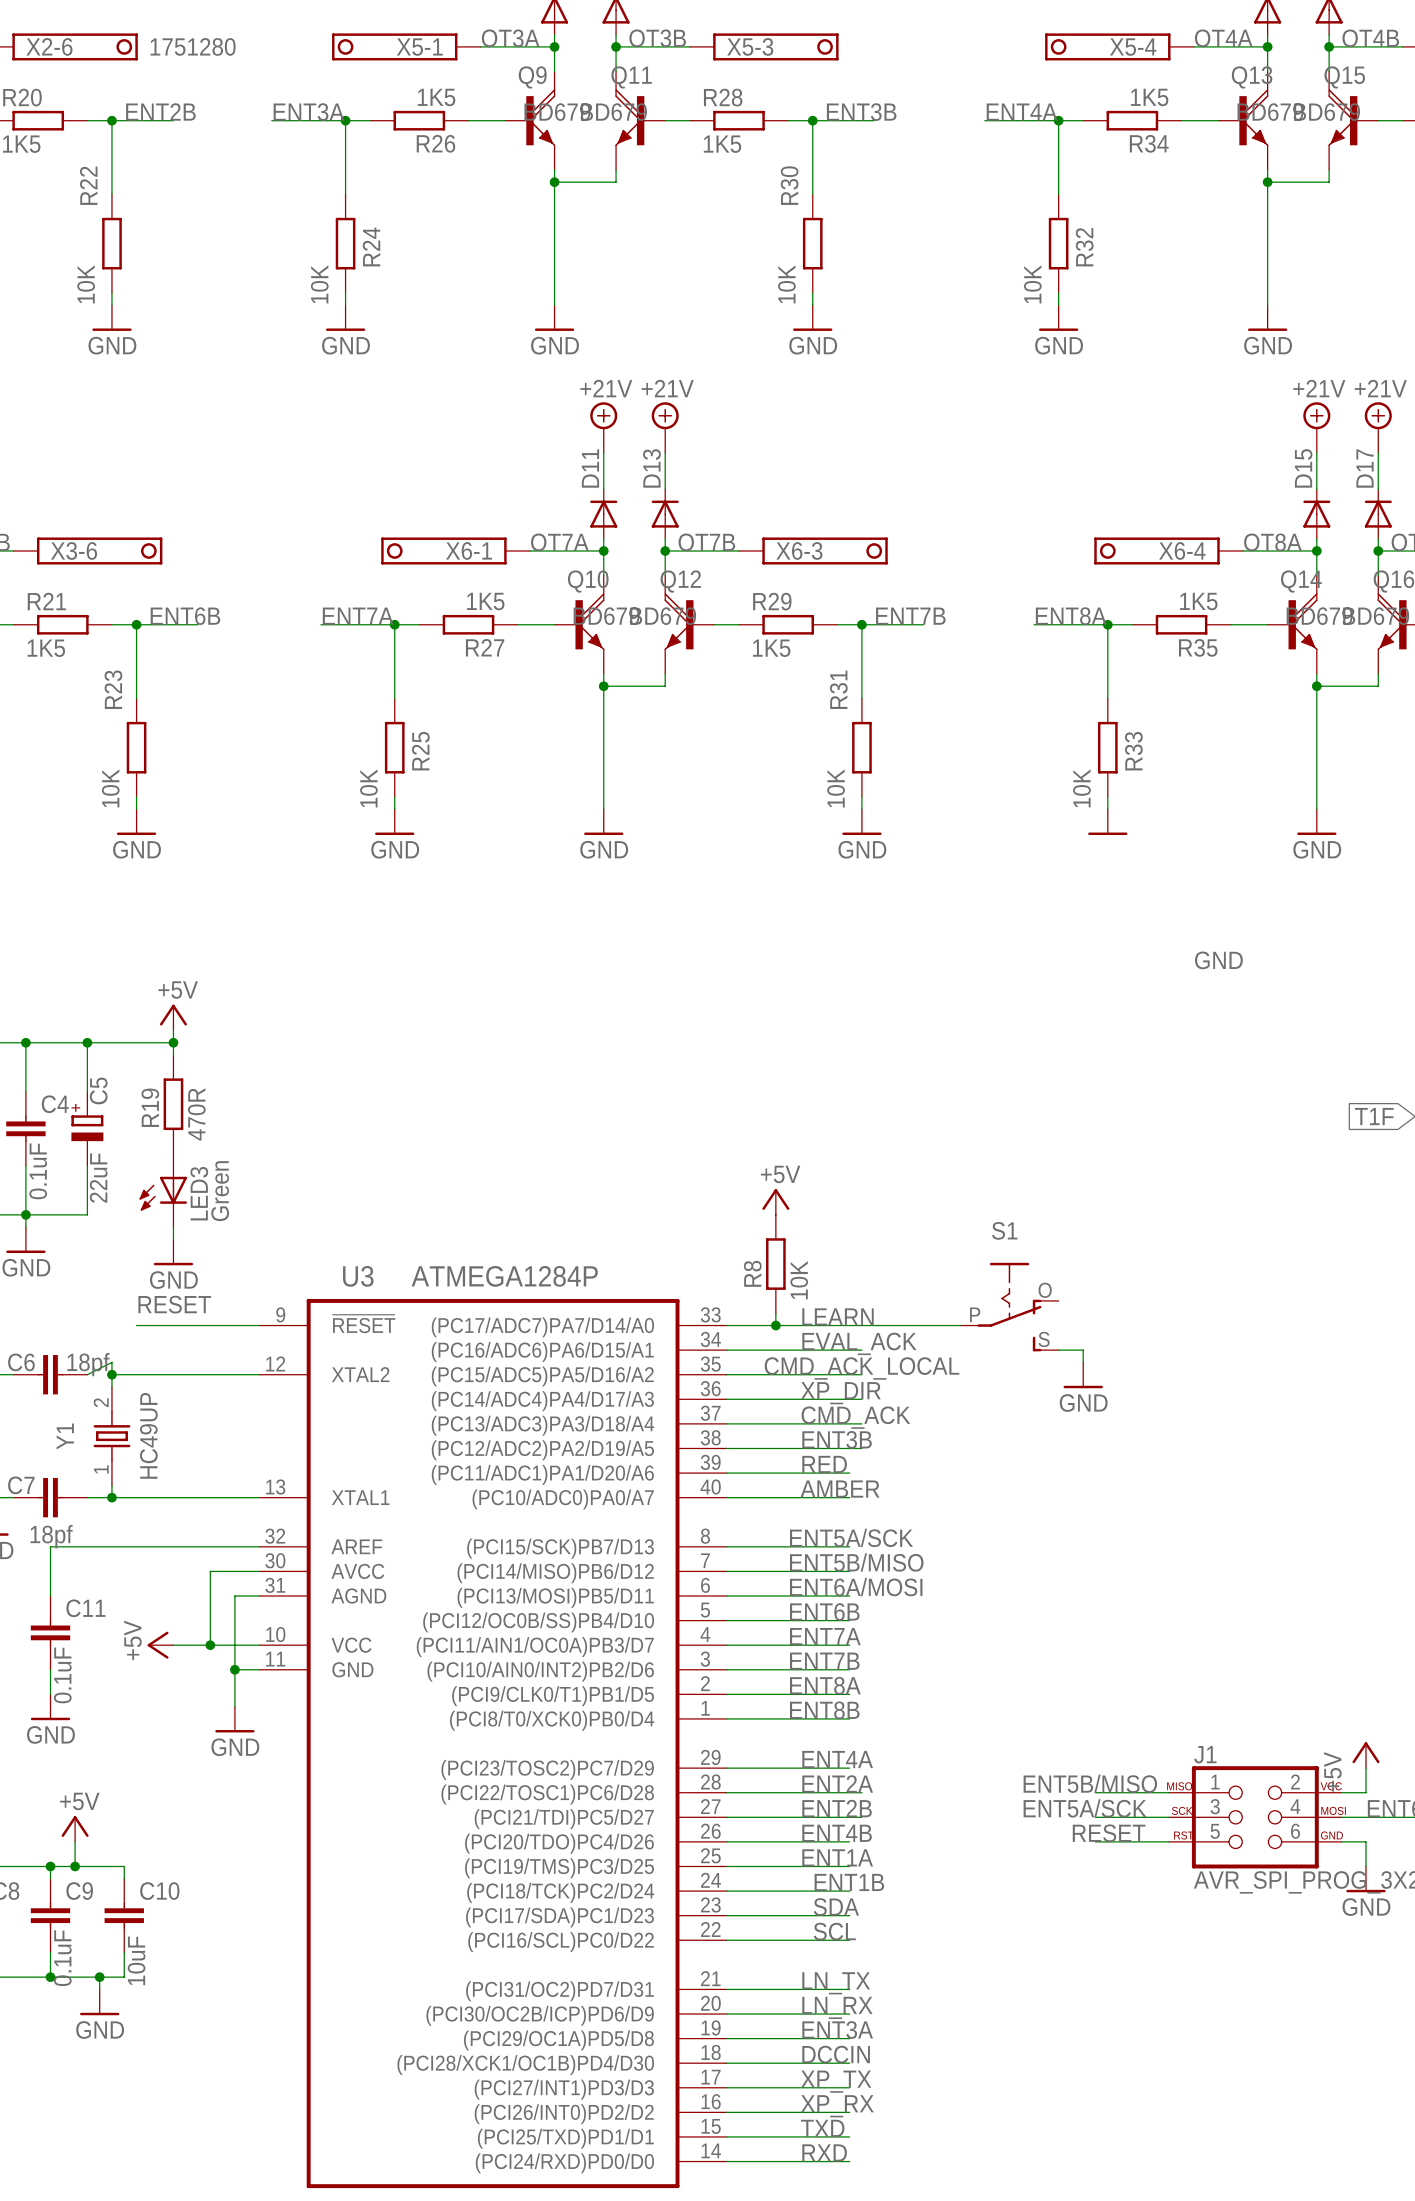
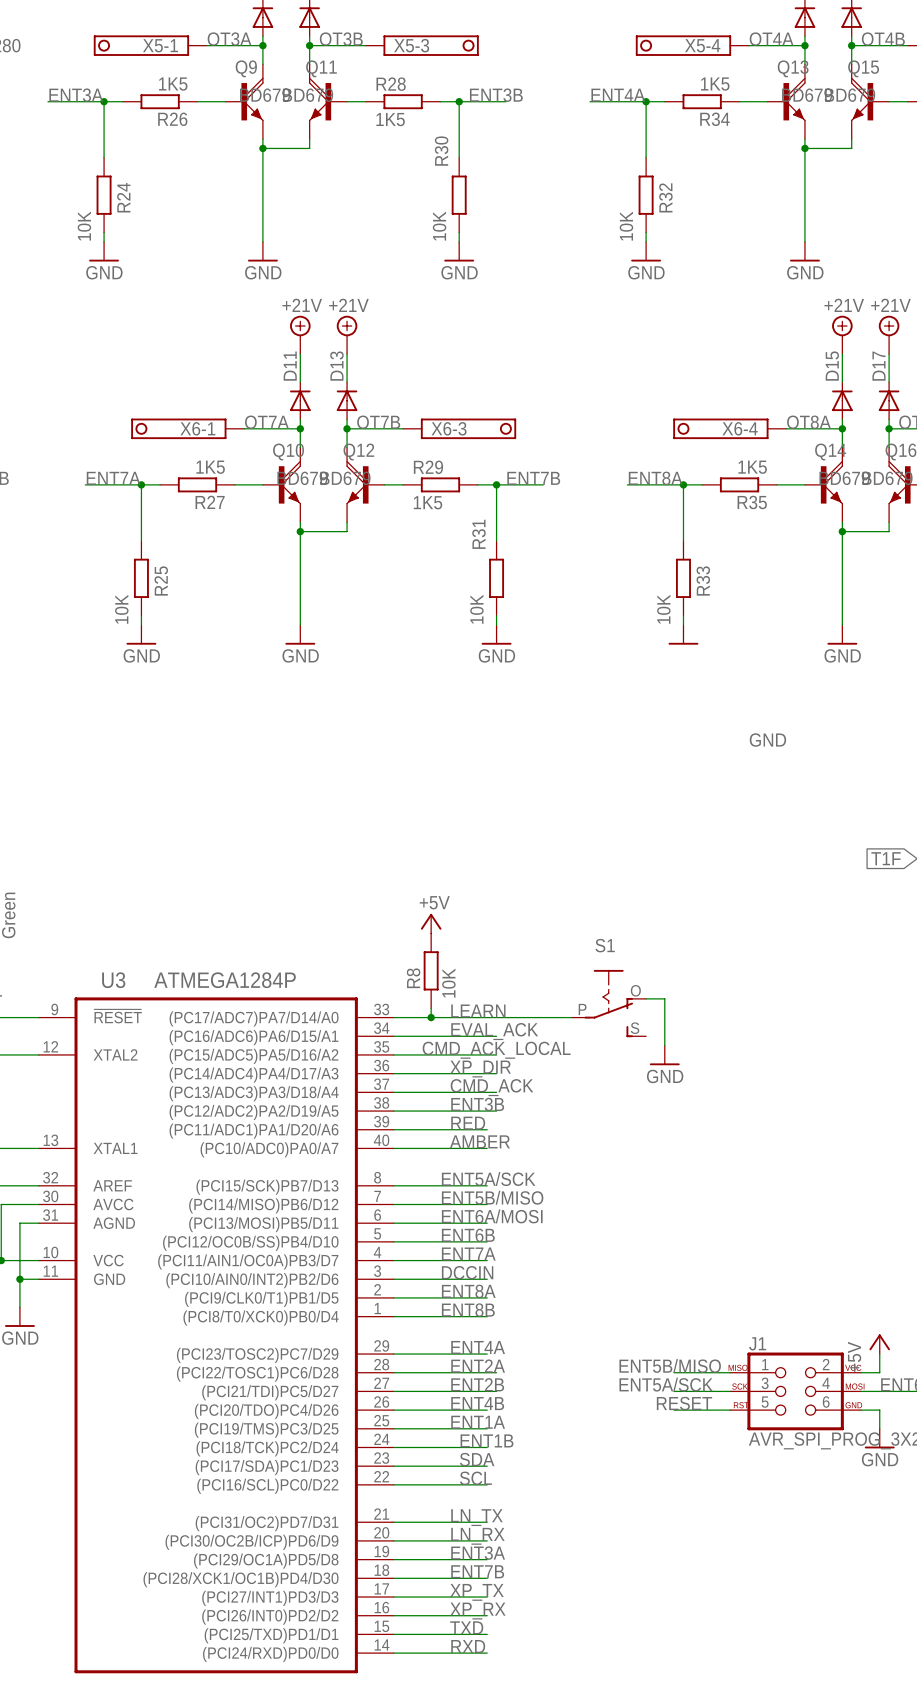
wire: (1058, 1350) (1083, 1350) -> (646, 998) (664, 998) (664, 1036)
label: ENT7B (824, 1661) -> DCCIN (467, 1272)
label: DCCIN (836, 2054) -> ENT7B (477, 1571)

